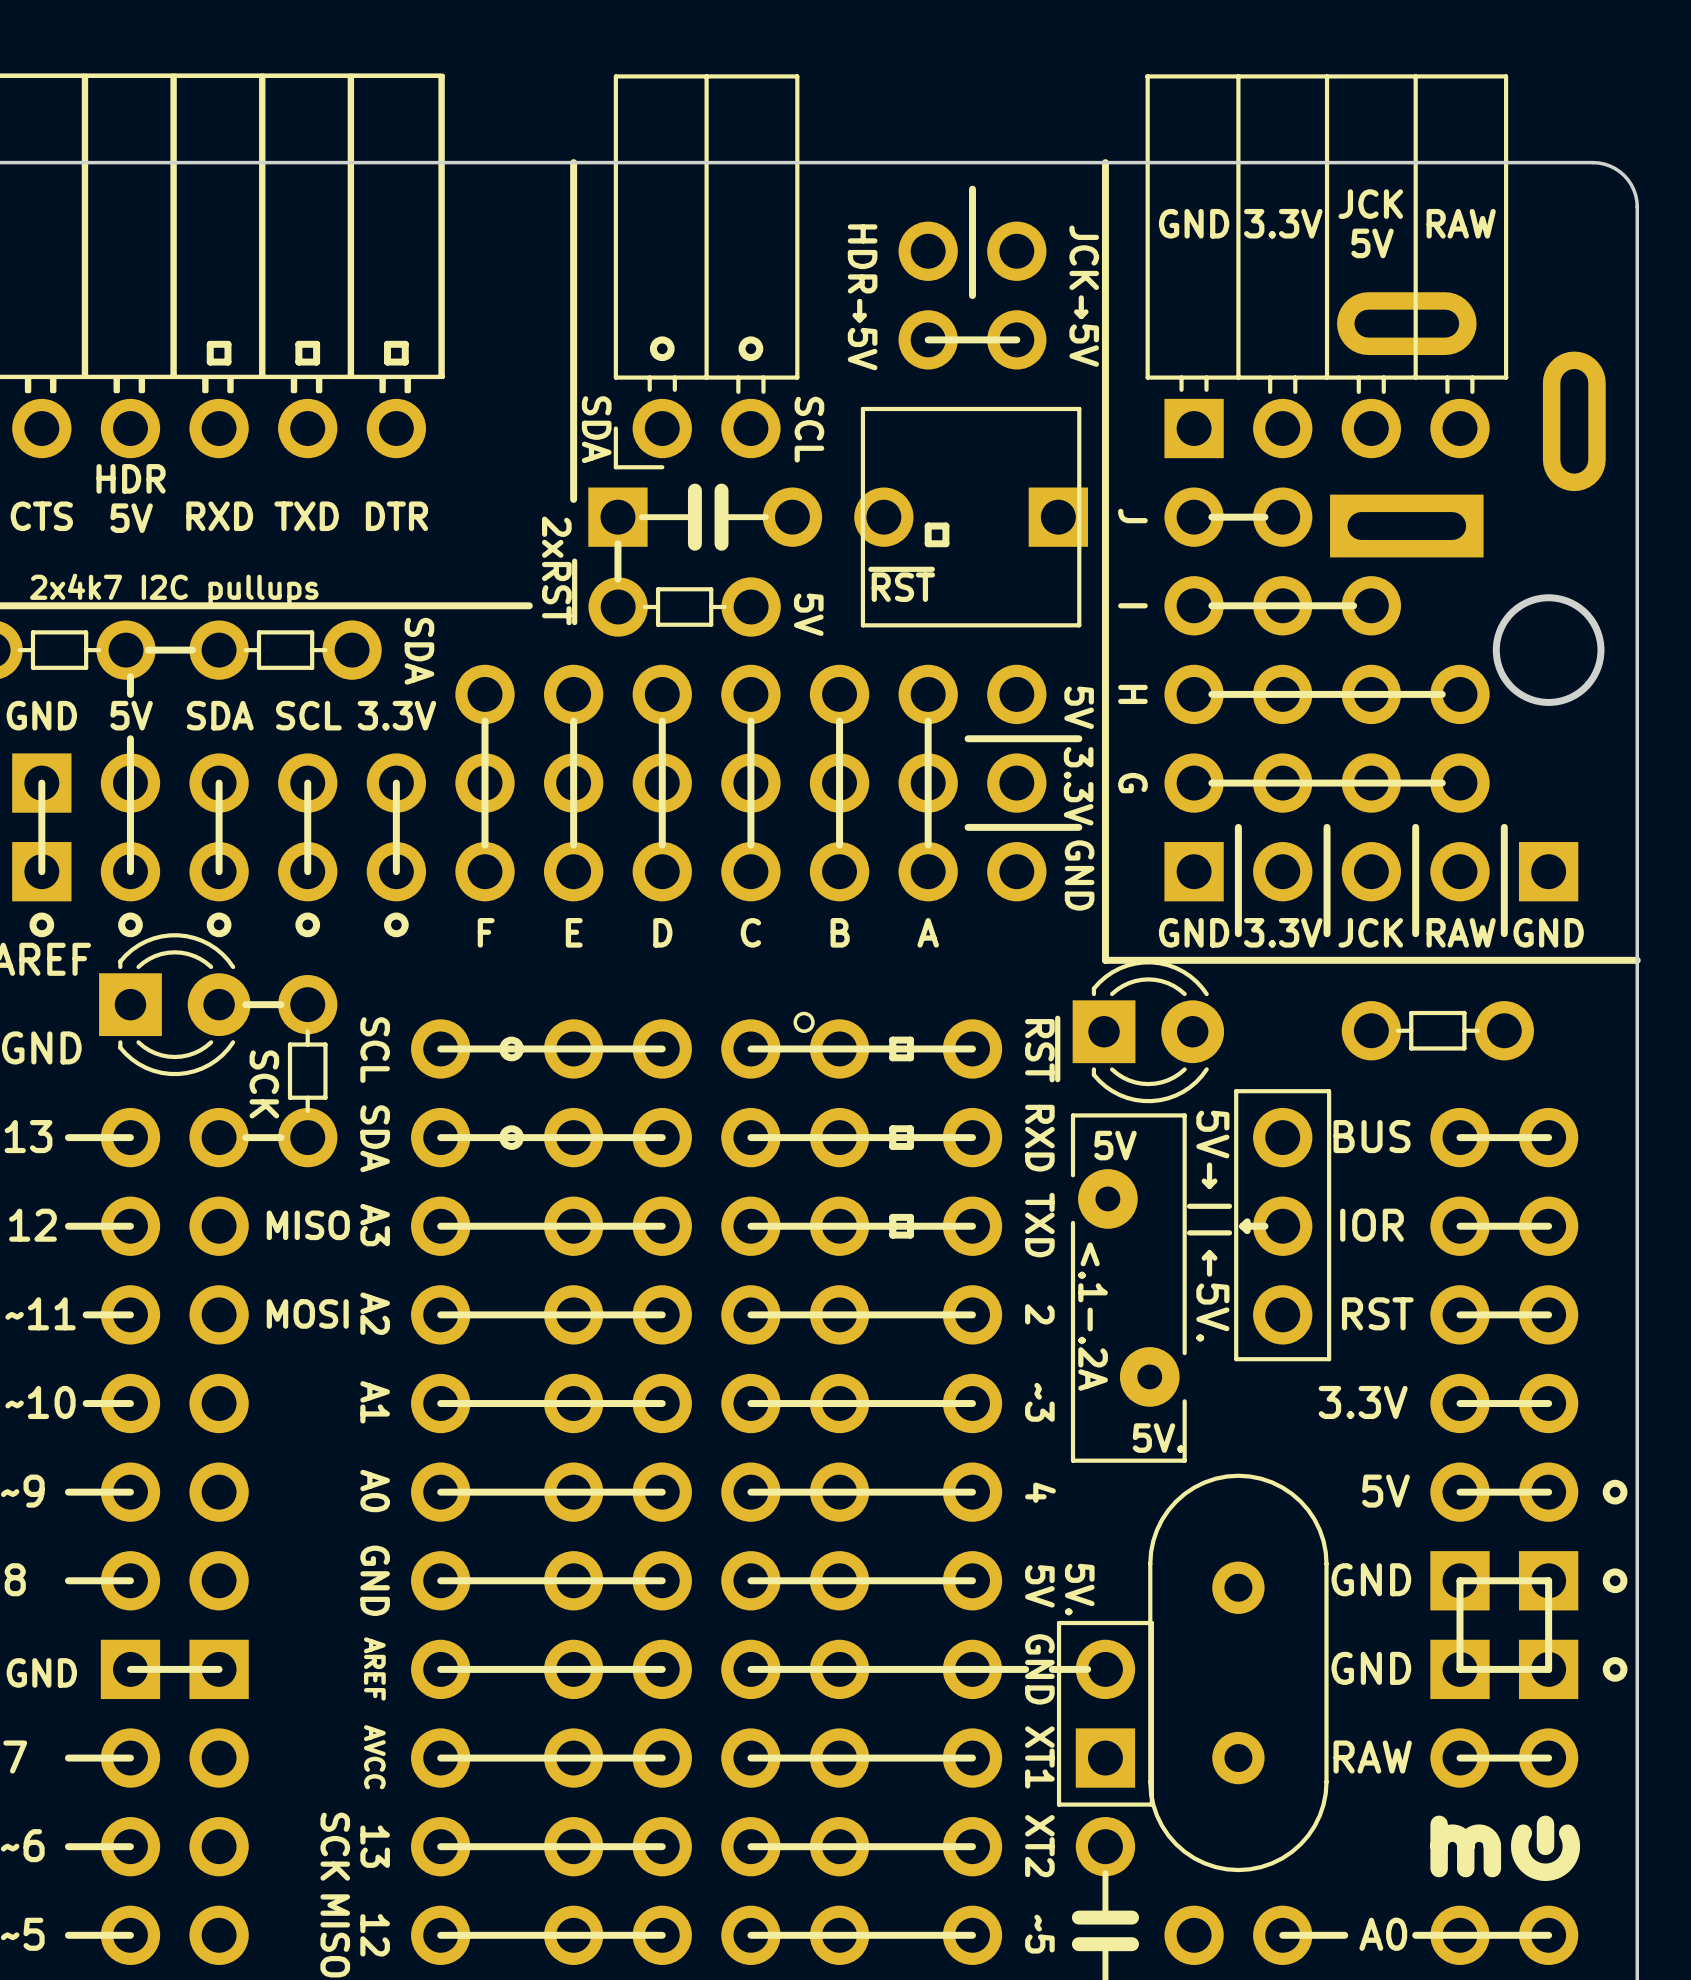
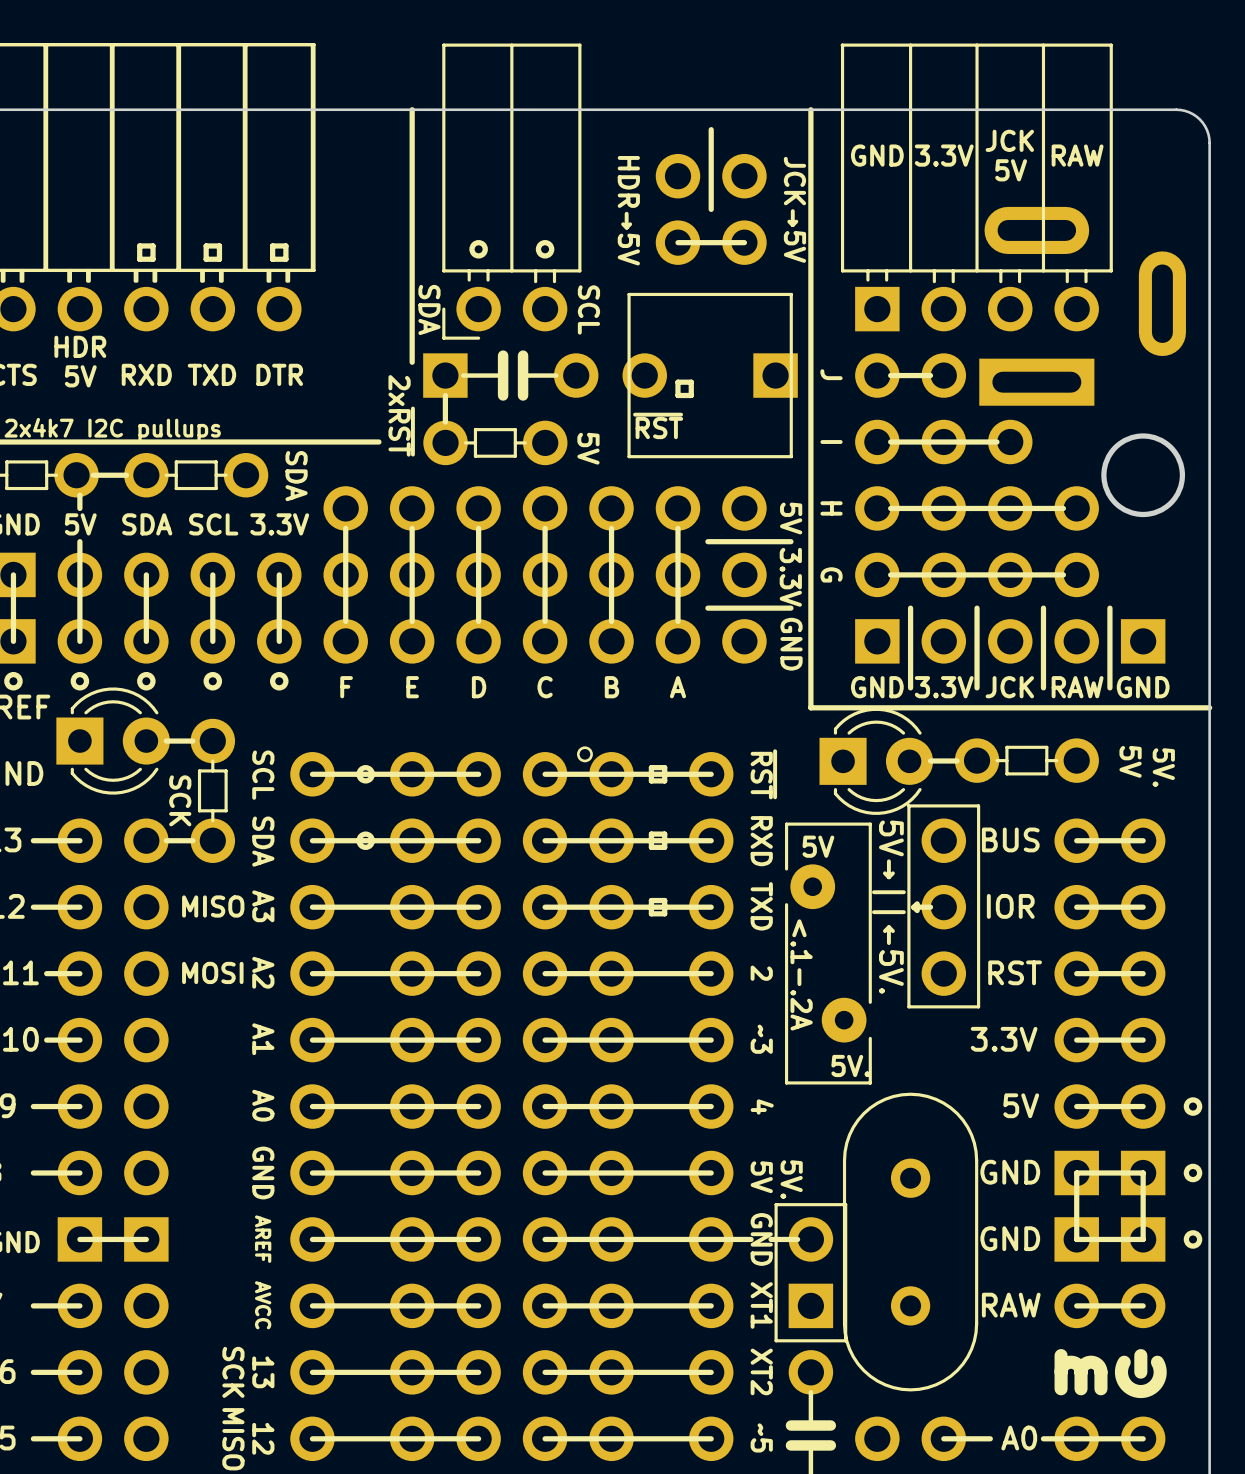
part position: (1437, 1030) -> (1026, 760)
part position: (1148, 1031) -> (876, 761)
line: none -> (957, 760) (930, 760)
text: none -> 5V (1130, 761)
text: none -> 5V. (1163, 767)

